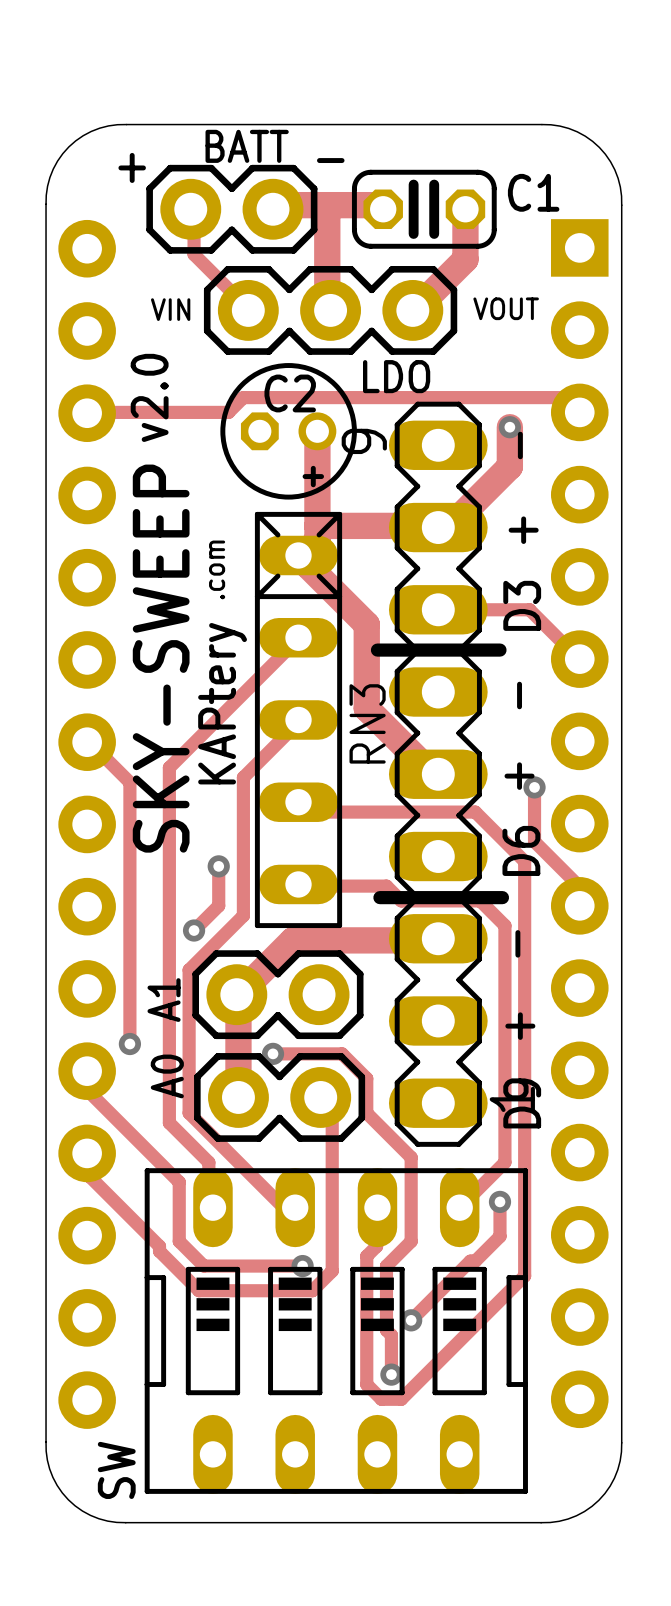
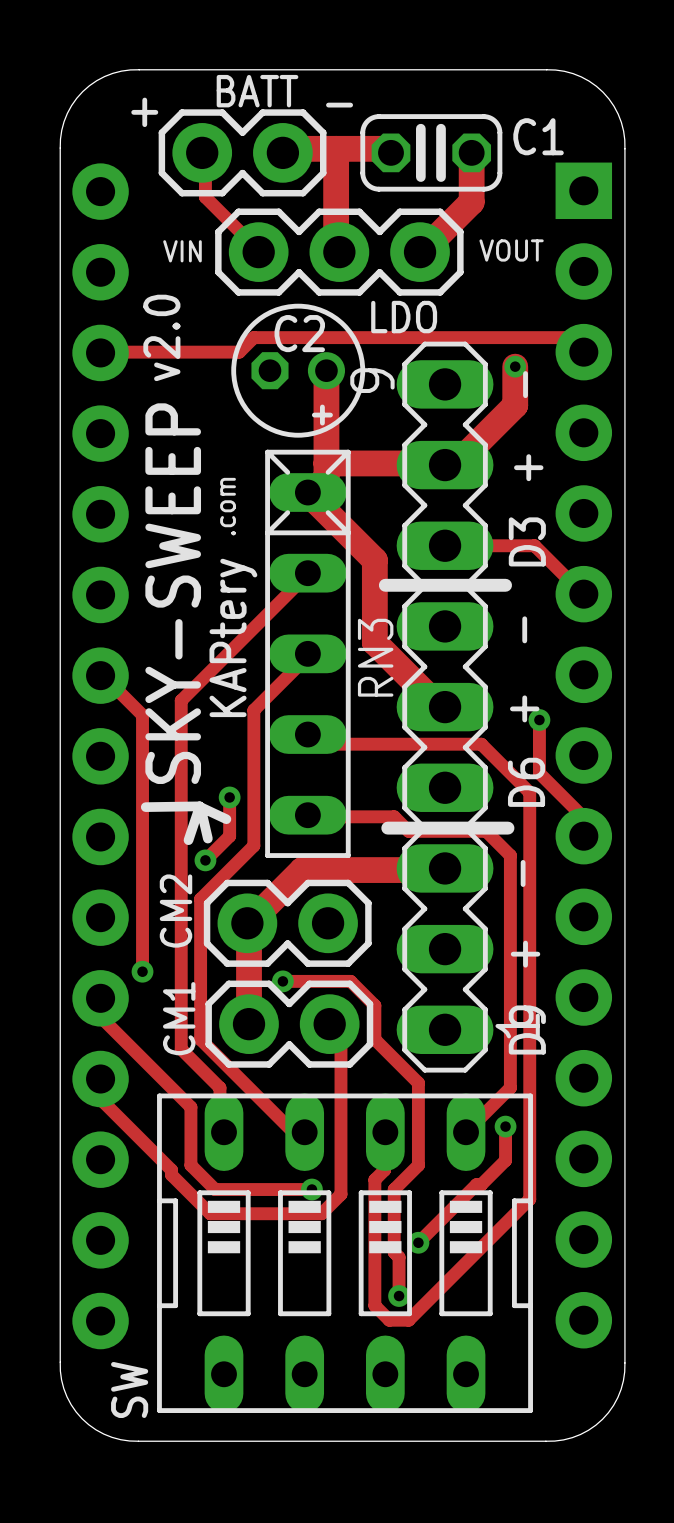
line: none -> (145, 807) (199, 806) (188, 840)
line: none -> (226, 819) (200, 807) (207, 838)
text: A1 (164, 1000) -> CM2 (176, 911)
text: A0 (167, 1076) -> CM1 (179, 1018)

